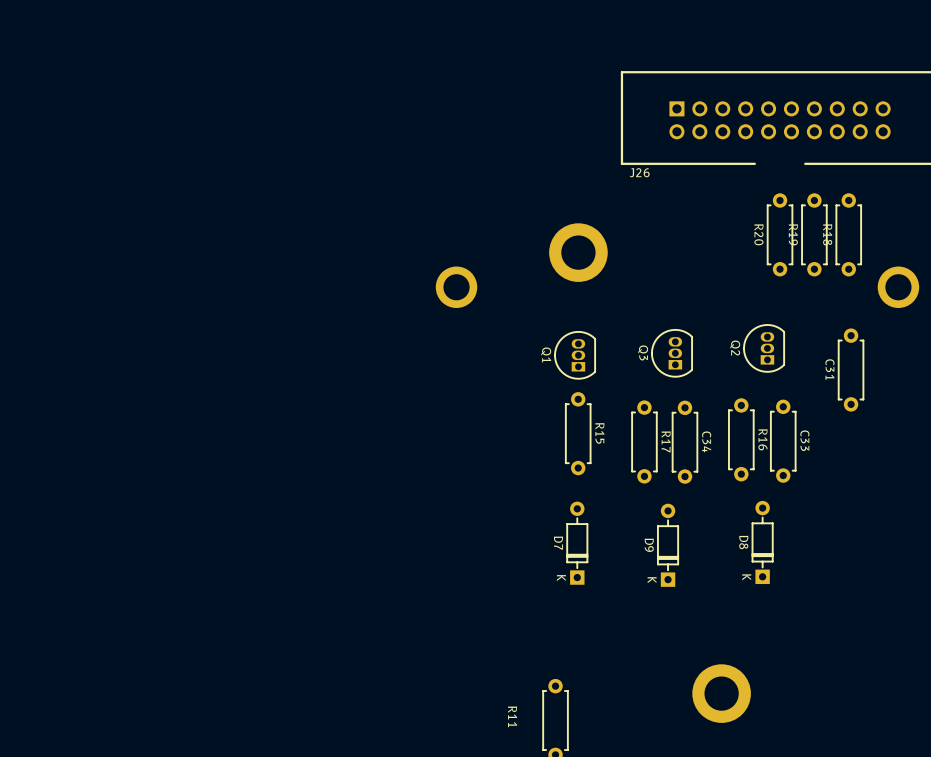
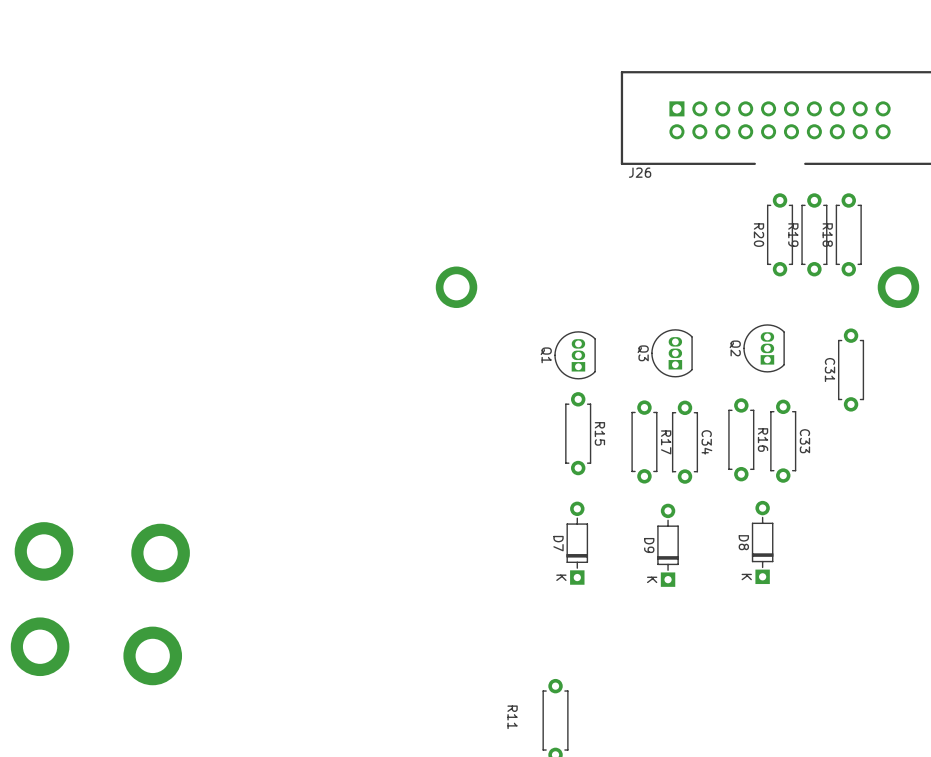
part: (578, 252) -> none
part: none -> (43, 551)
part: none -> (160, 553)
part: none -> (40, 646)
part: none -> (152, 655)
part: (721, 693) -> none

